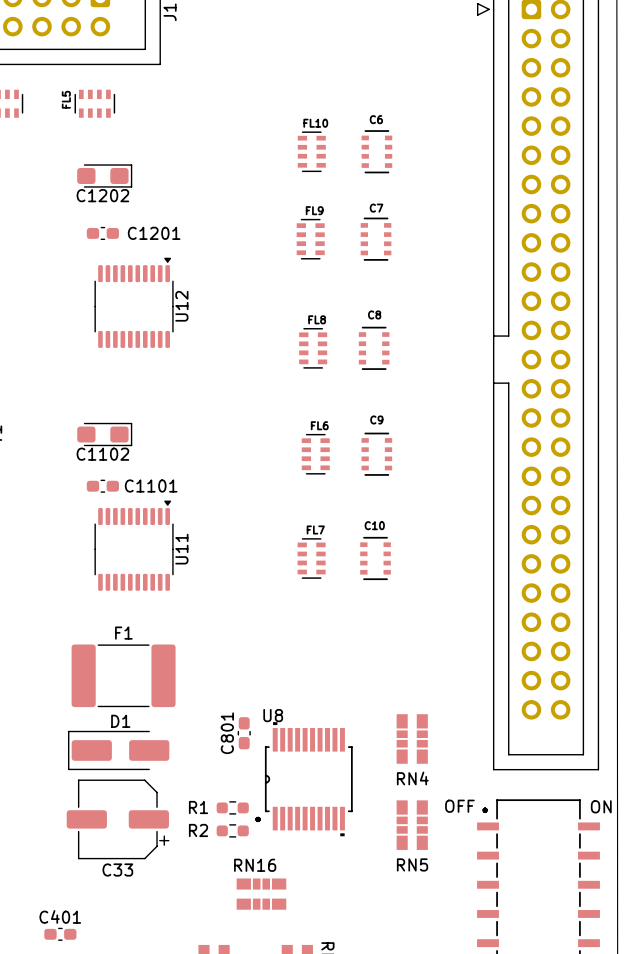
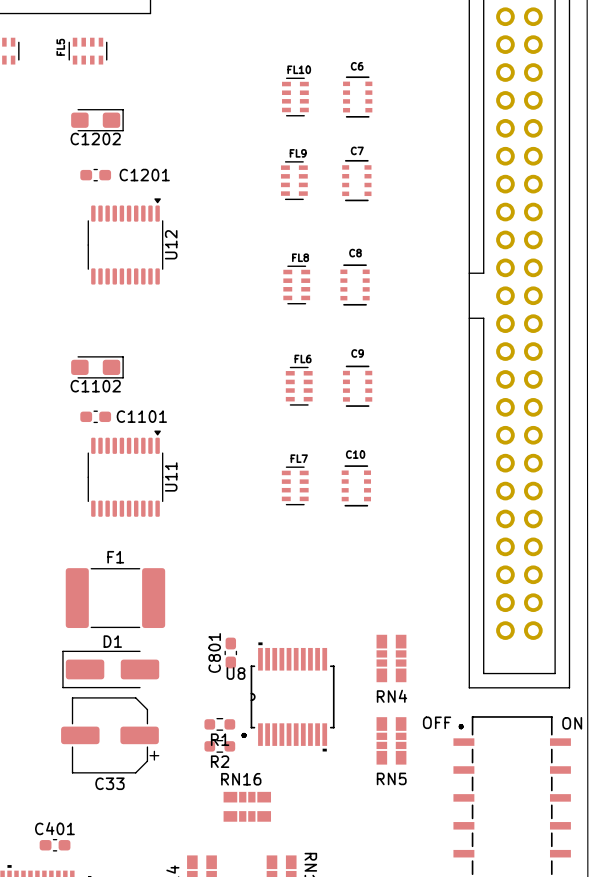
U8 name position: U8 (273, 715) -> U8 (236, 673)
R1 name position: R1 (198, 807) -> R1 (220, 739)
R2 name position: R2 (198, 830) -> R2 (220, 761)

